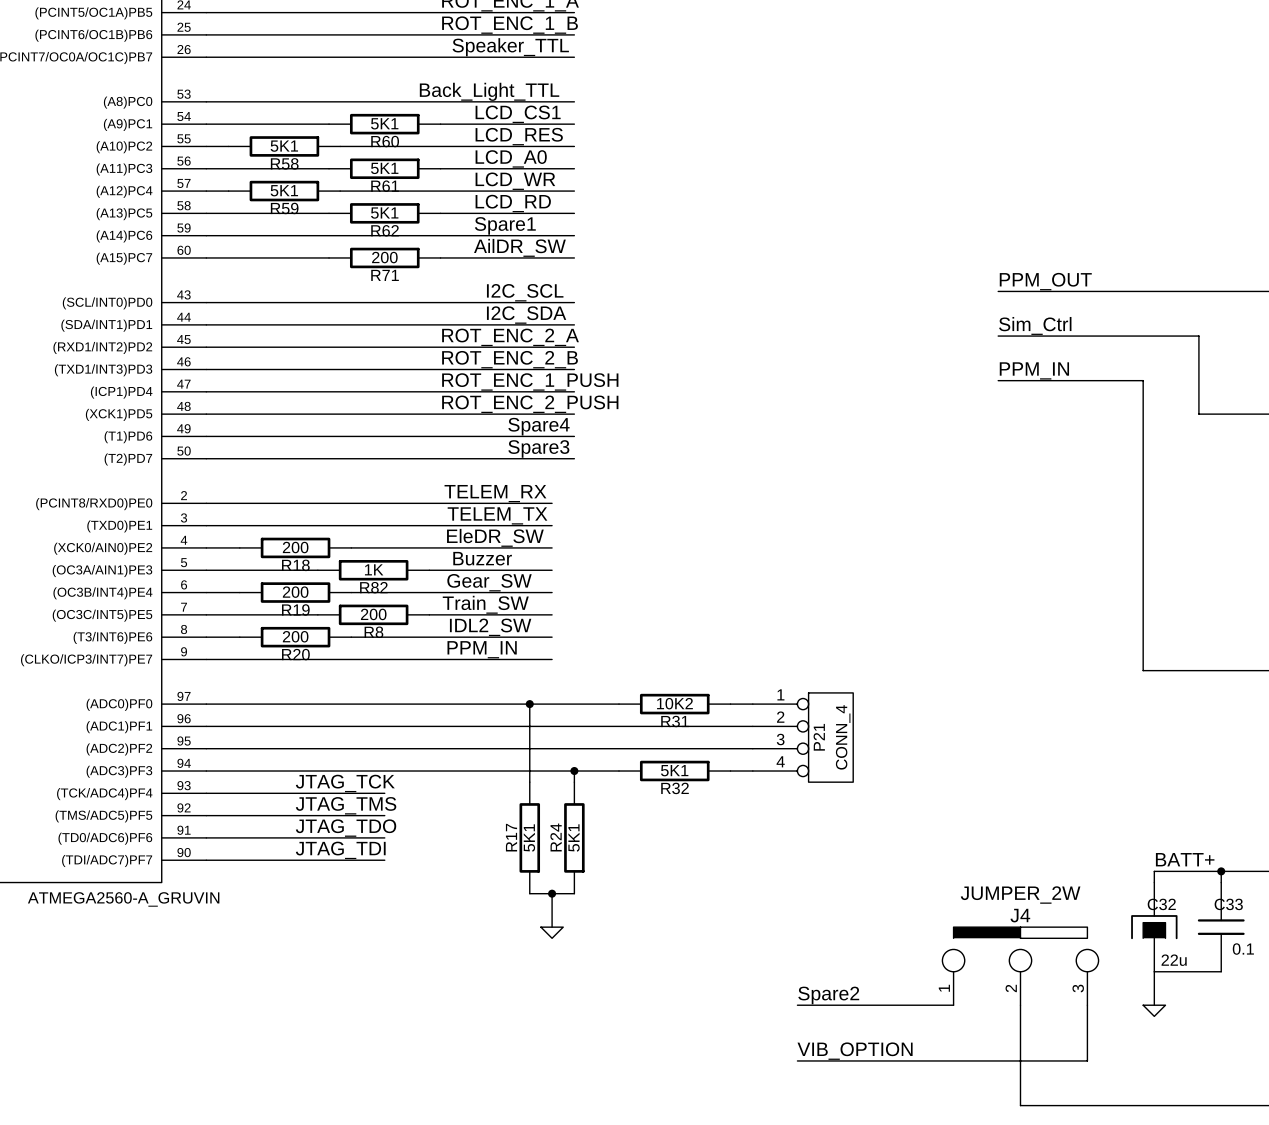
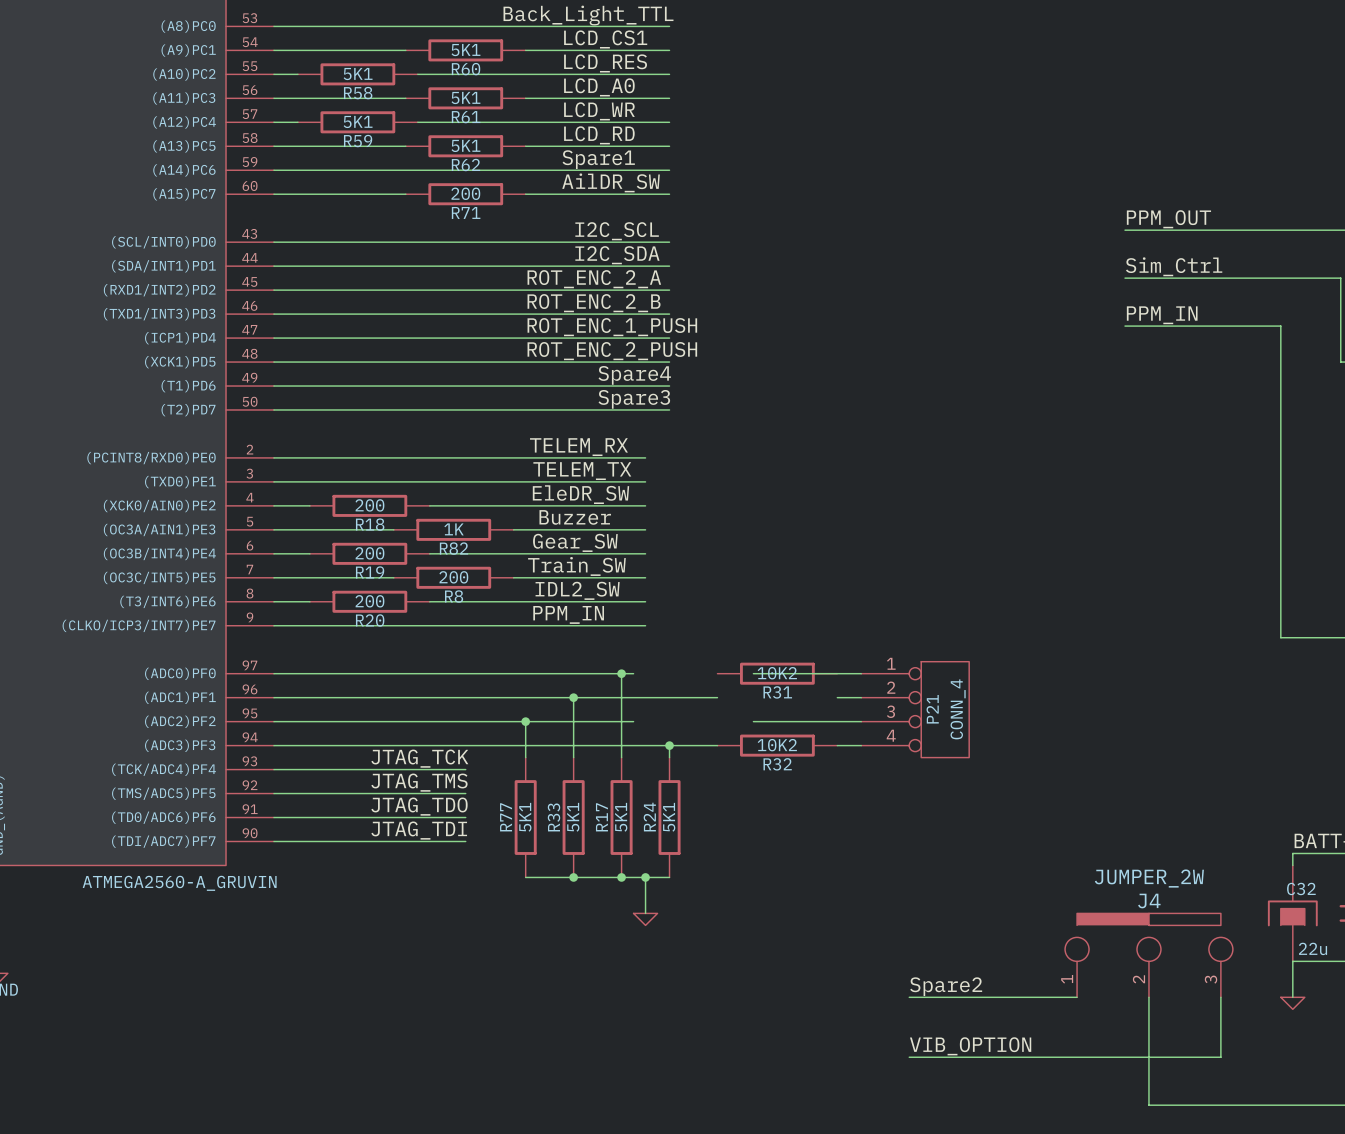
wire: (540, 704) (618, 704) -> (753, 673) (837, 673)
wire: none -> (573, 697) (573, 757)
junction: none -> (573, 697)
wire: (618, 726) (730, 726) -> none
wire: none -> (525, 721) (525, 757)
junction: none -> (525, 721)
wire: (540, 748) (652, 748) -> none
R32 value: 5K1 (674, 770) -> 10K2 (777, 745)
R77: none -> 5K1 (525, 817)
R33: none -> 5K1 (573, 817)
wire: none -> (525, 877) (621, 877)
junction: none -> (573, 877)
junction: none -> (621, 877)

